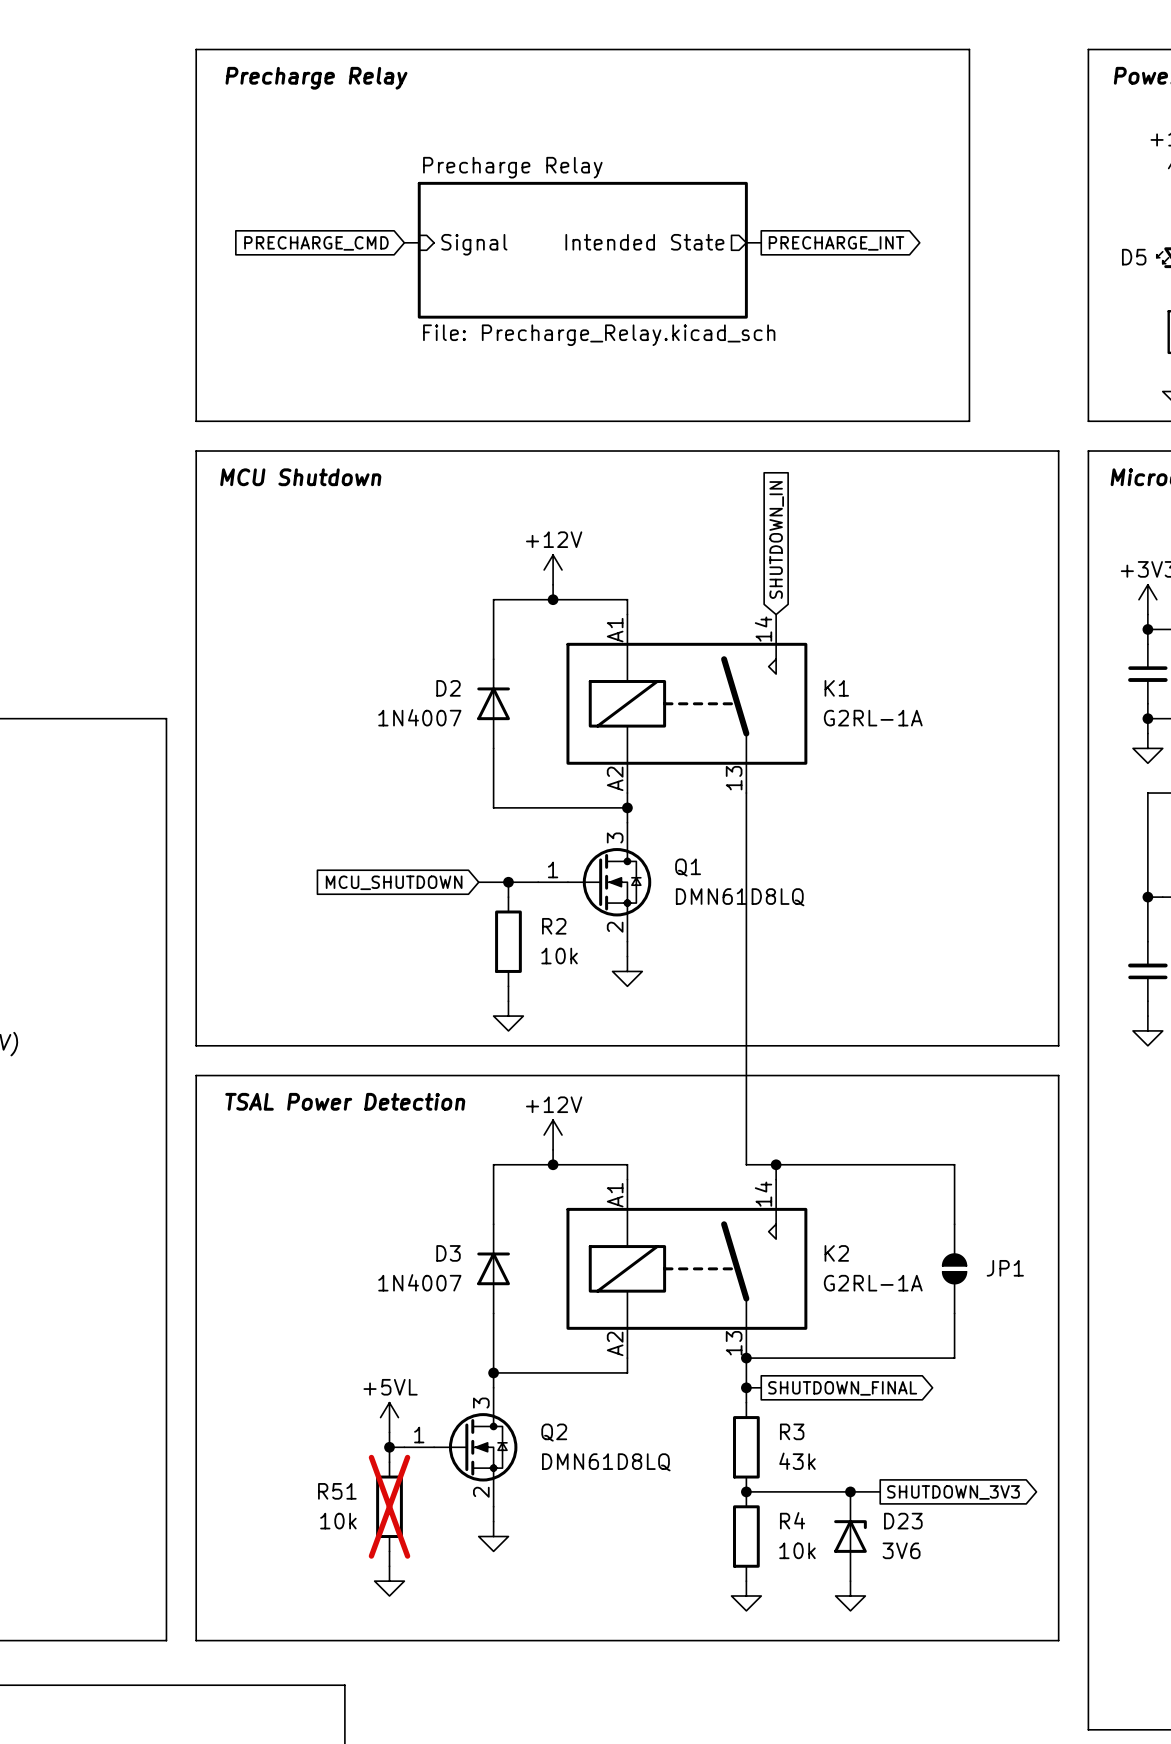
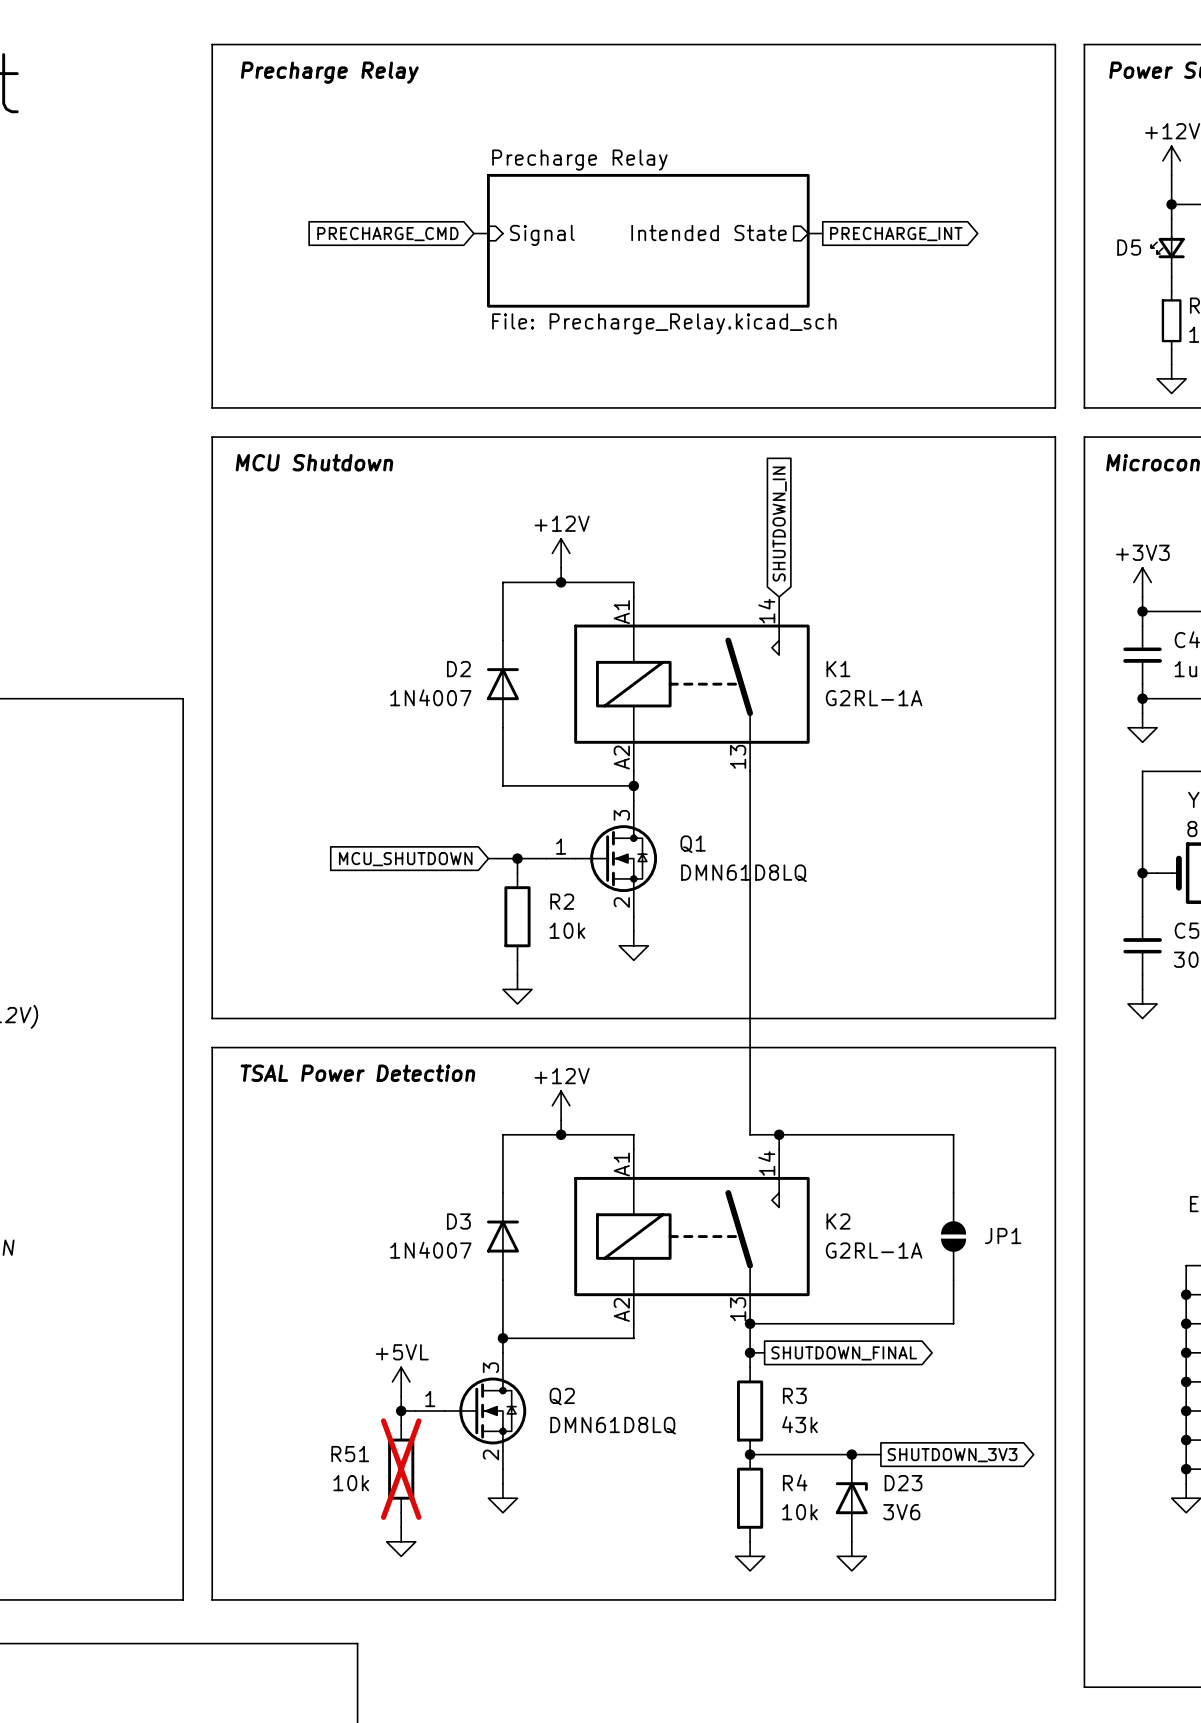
line: (969, 49) (969, 421) -> (968, 44) (1055, 44) (1055, 407) (968, 407)
wire: (404, 242) (419, 242) -> (473, 233) (488, 233)
sheet pin position: Intended State (644, 242) -> Intended State (709, 232)
wire: (746, 242) (761, 242) -> (808, 233) (822, 233)
global label position: PRECHARGE_CMD (316, 243) -> PRECHARGE_CMD (387, 234)
global label position: PRECHARGE_INT (836, 243) -> PRECHARGE_INT (896, 234)
sheet pin position: Signal (474, 244) -> Signal (542, 235)
sheet Precharge Relay position: (582, 250) -> (648, 240)

